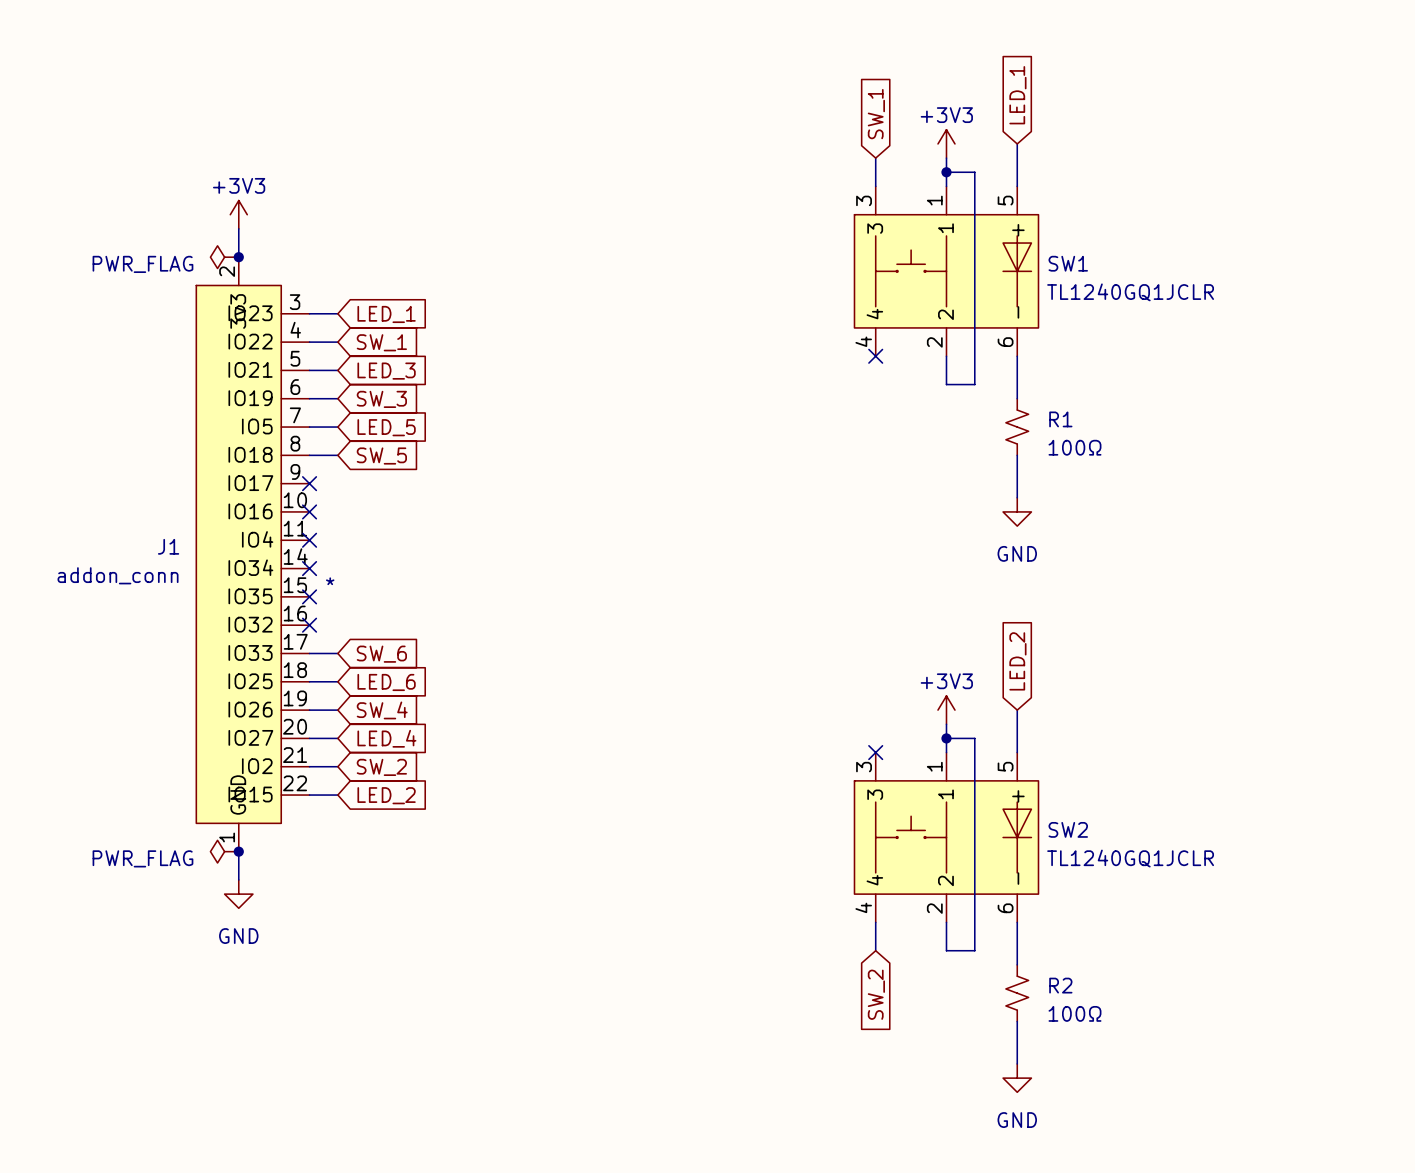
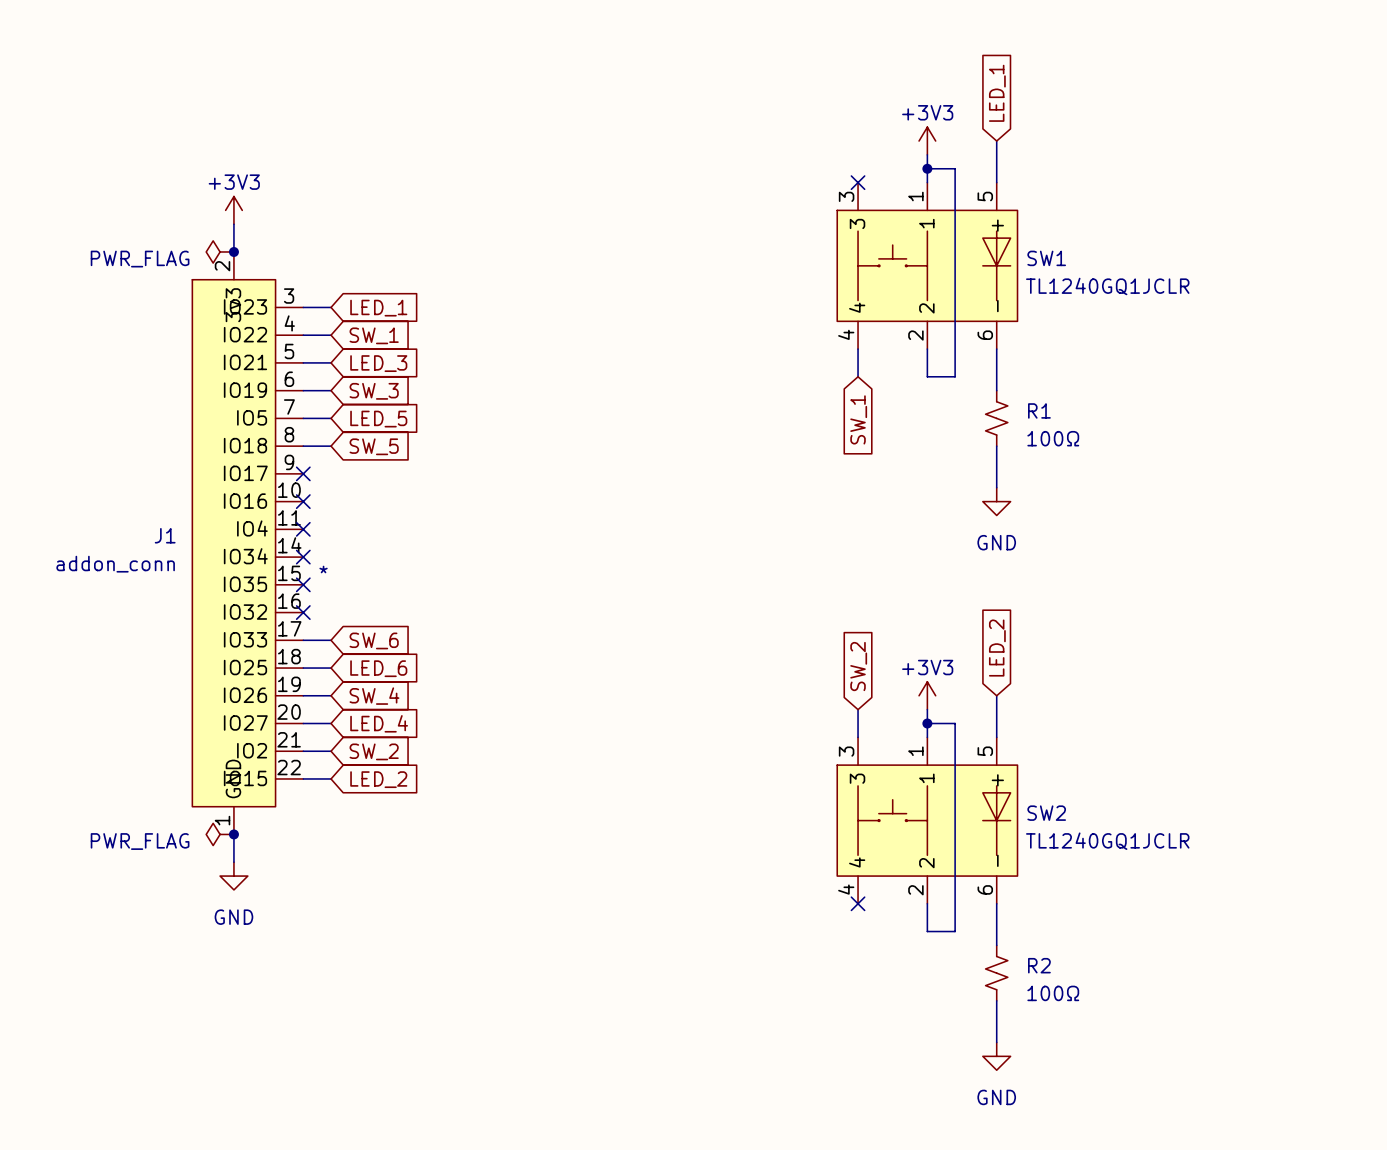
global label rotation: 0° (876, 114) -> 180° (858, 419)
global label position: SW_1 (876, 114) -> SW_1 (858, 419)
wire: (875, 158) (875, 186) -> (858, 349) (858, 376)
no-connect mark: none -> (858, 182)
no-connect mark: (875, 356) -> none
no-connect mark: (875, 752) -> none
wire: (875, 922) (875, 950) -> (858, 709) (858, 737)
no-connect mark: none -> (858, 903)
global label rotation: 0° (876, 994) -> 180° (858, 666)
global label position: SW_2 (876, 994) -> SW_2 (858, 666)

